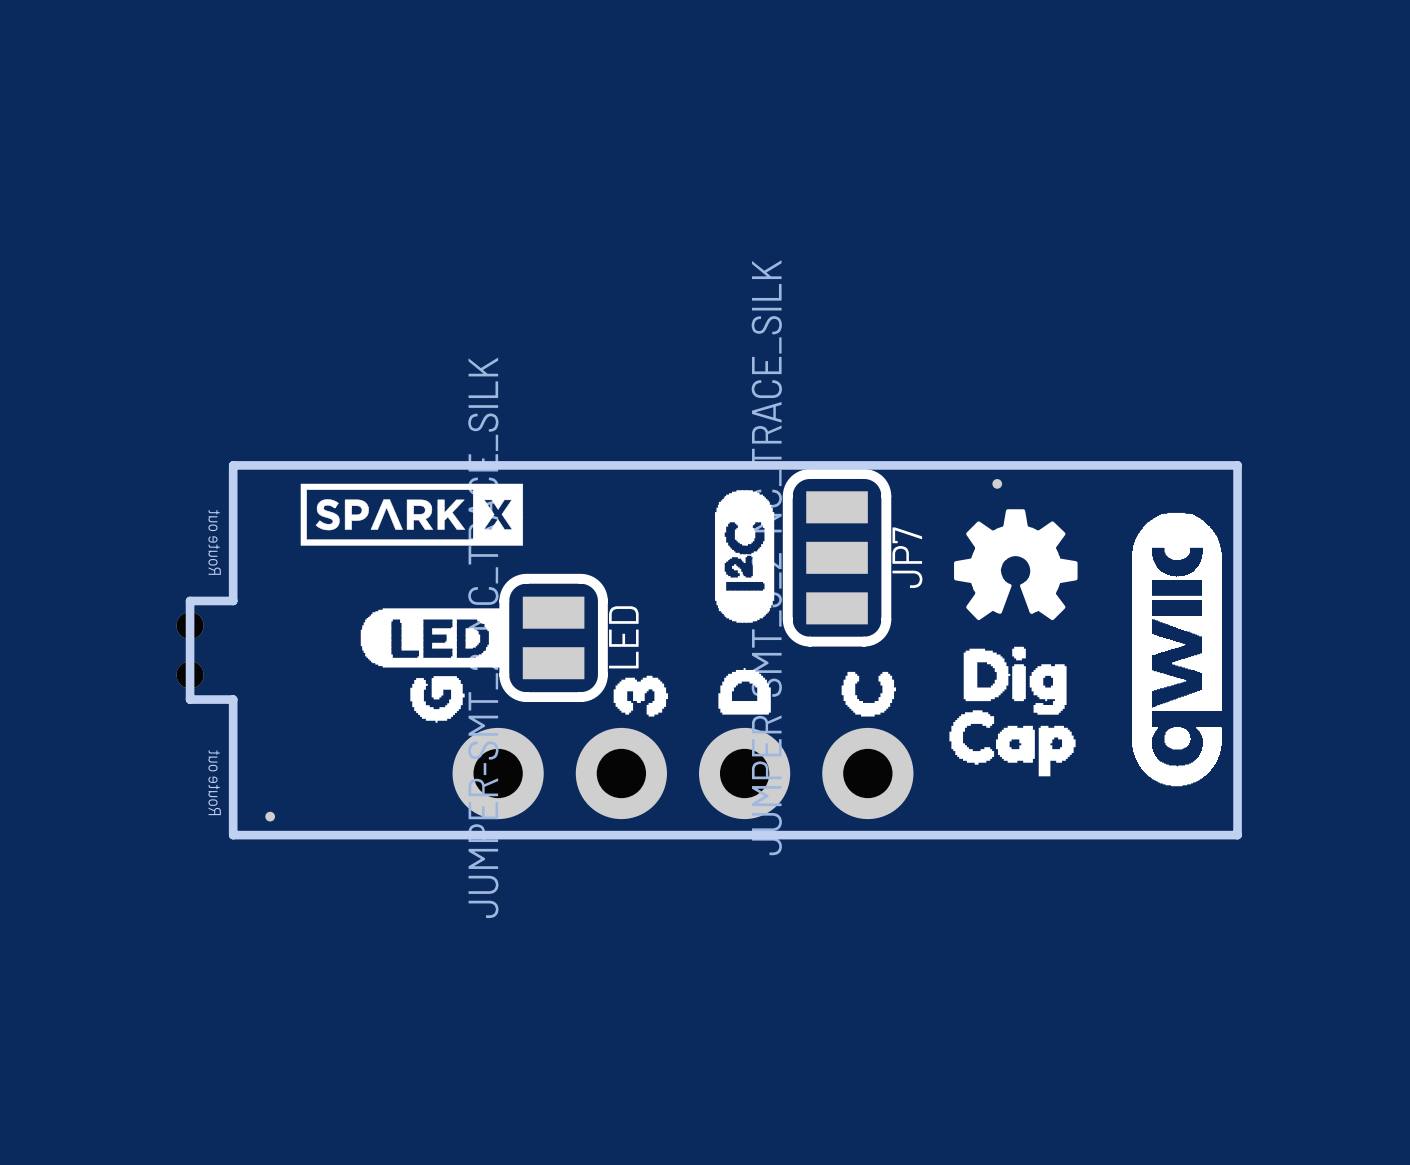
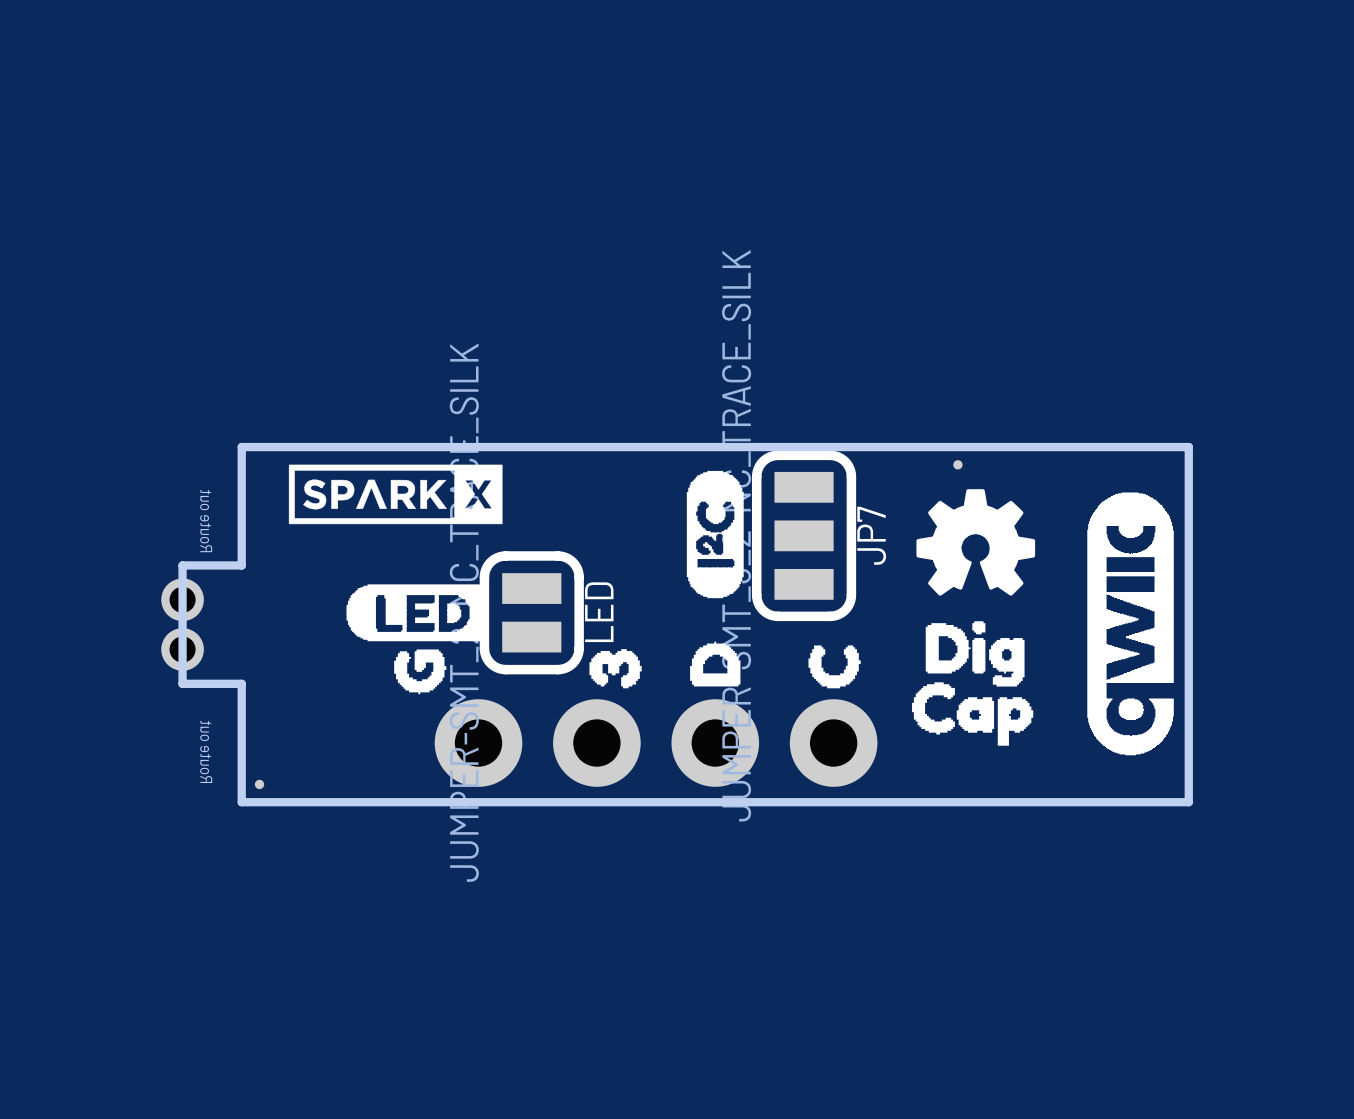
board edge: (251, 465) (233, 465) (233, 600) (190, 600) -> (241, 447) (241, 565) (182, 565) (182, 577)
part footprint: [176, 612, 204, 689] -> [161, 578, 204, 671]
board edge: (190, 699) (233, 699) (233, 835) (251, 835) -> (182, 671) (182, 683) (241, 683) (241, 802)

